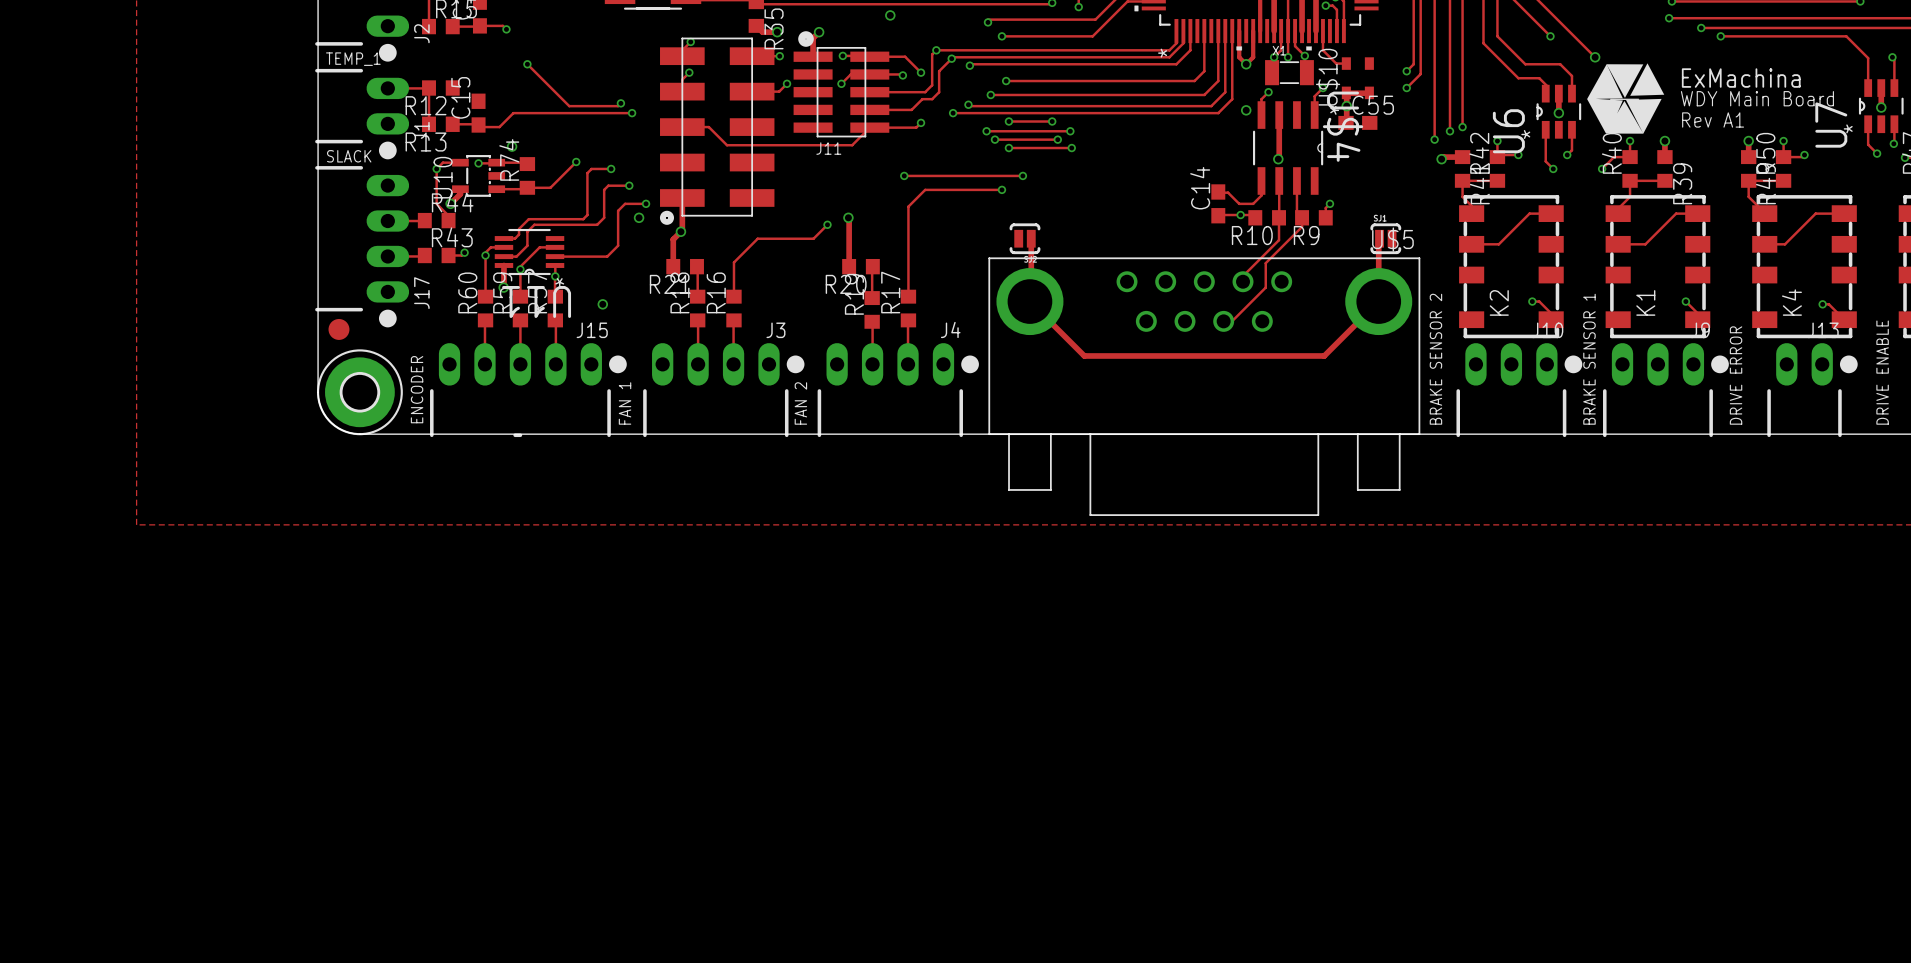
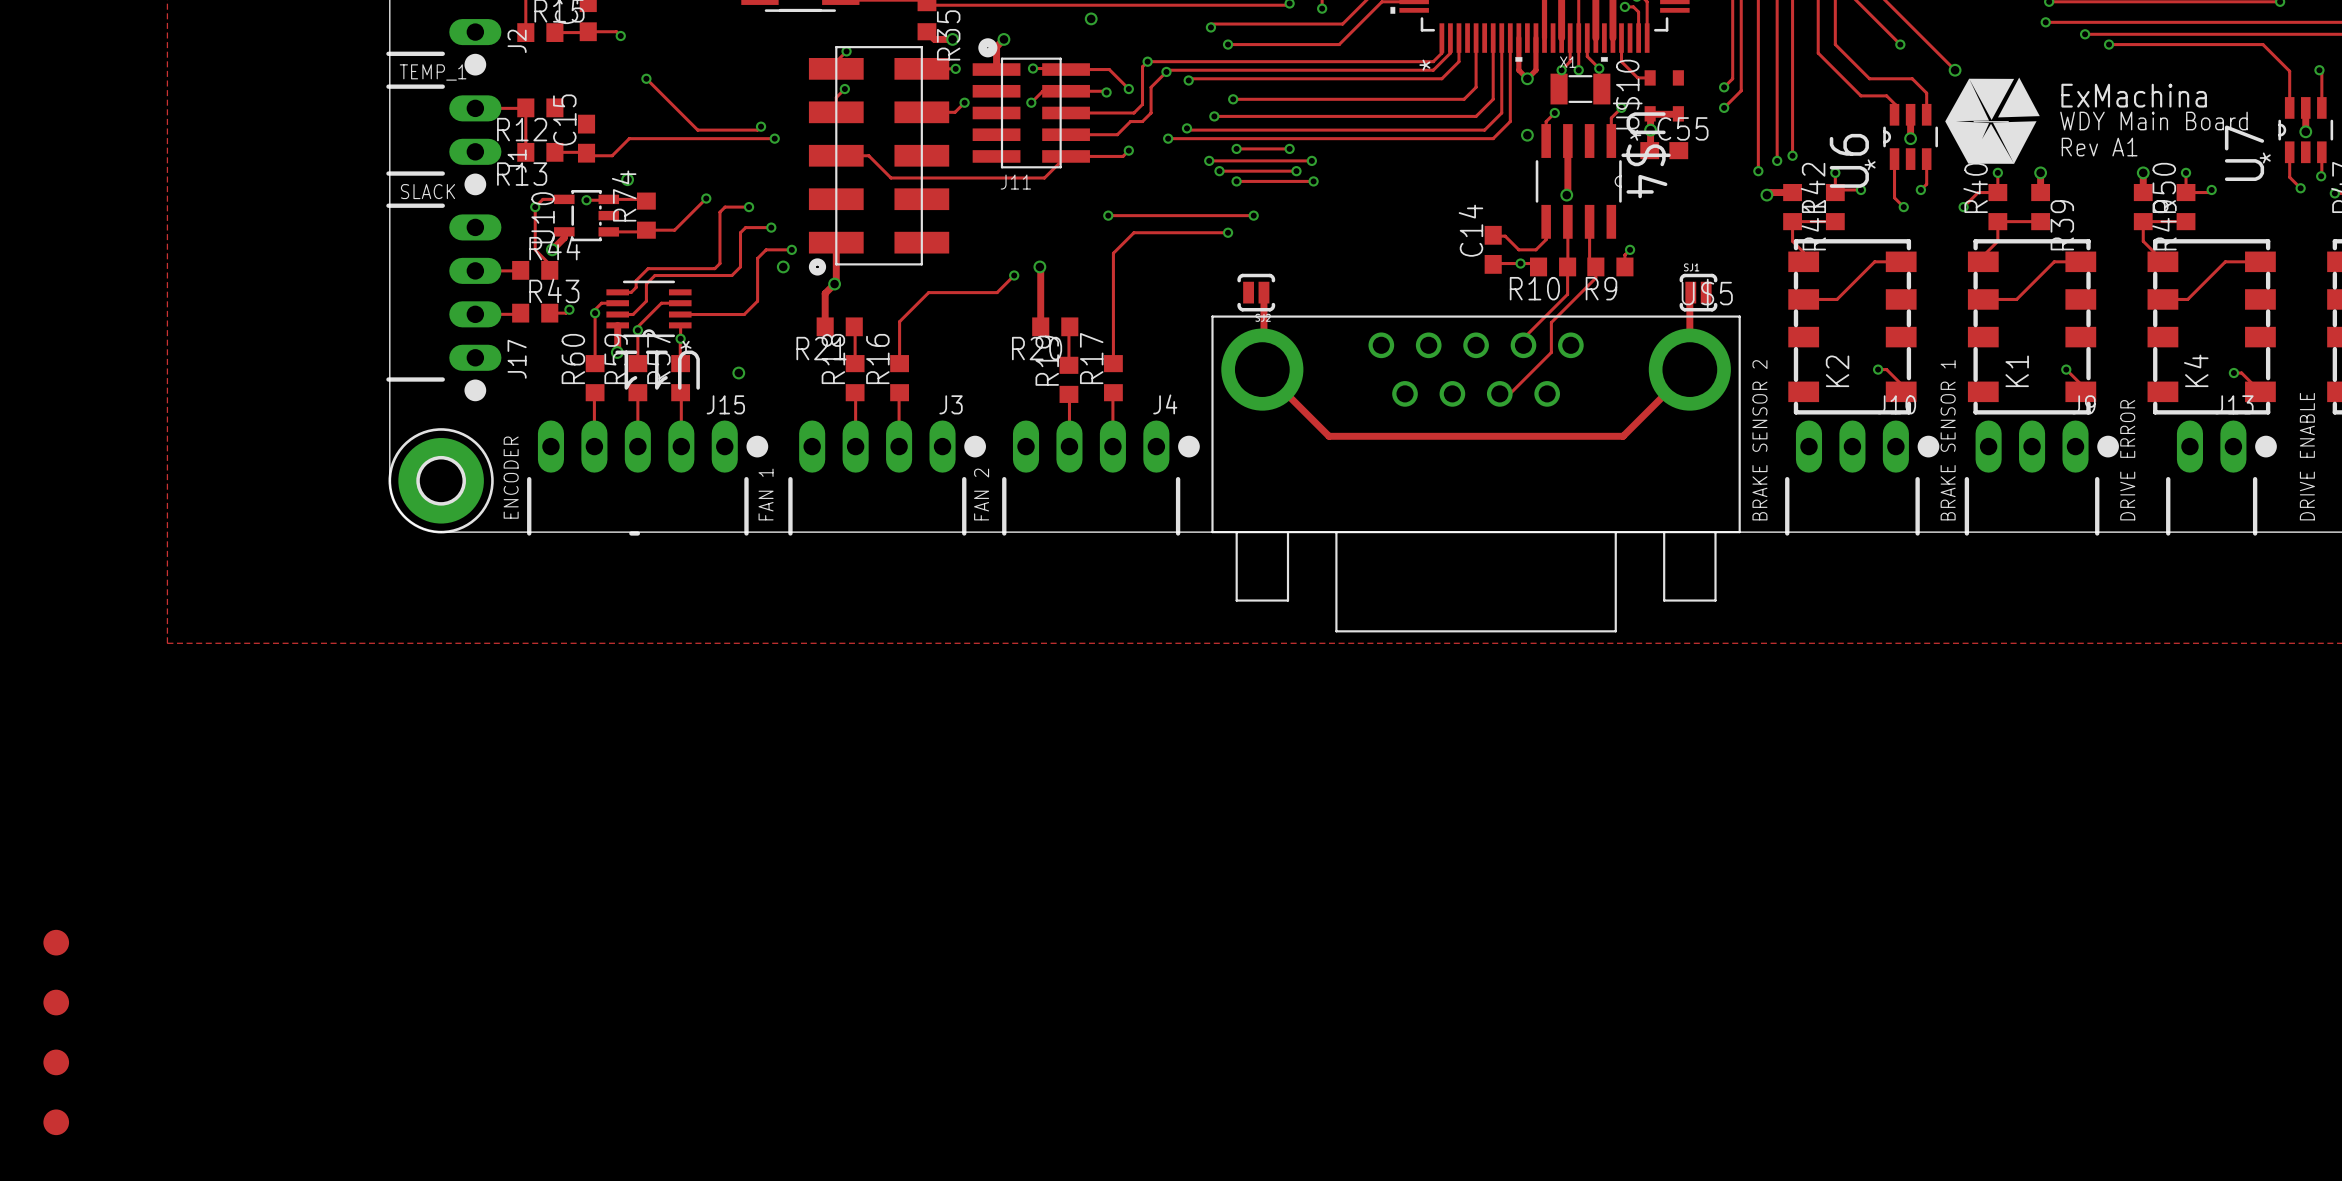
part: (338, 329) -> none
part: none -> (56, 942)
part: none -> (56, 1002)
part: none -> (56, 1062)
part: none -> (56, 1122)

